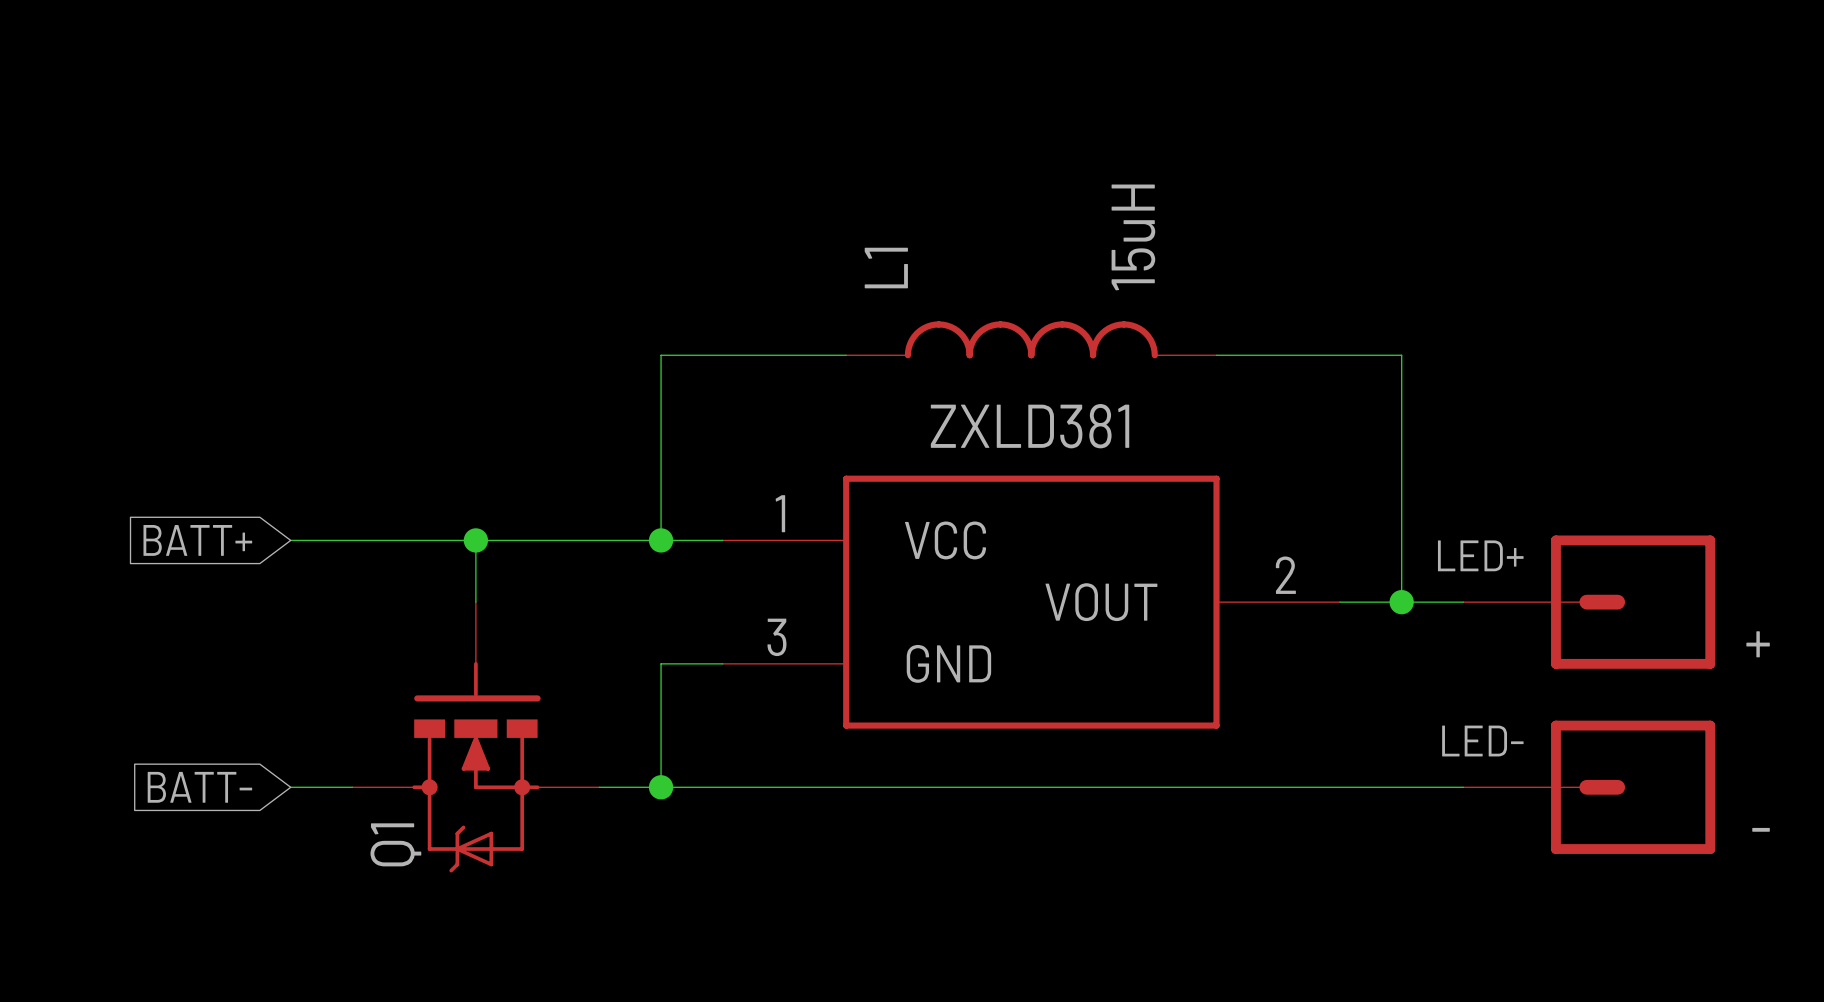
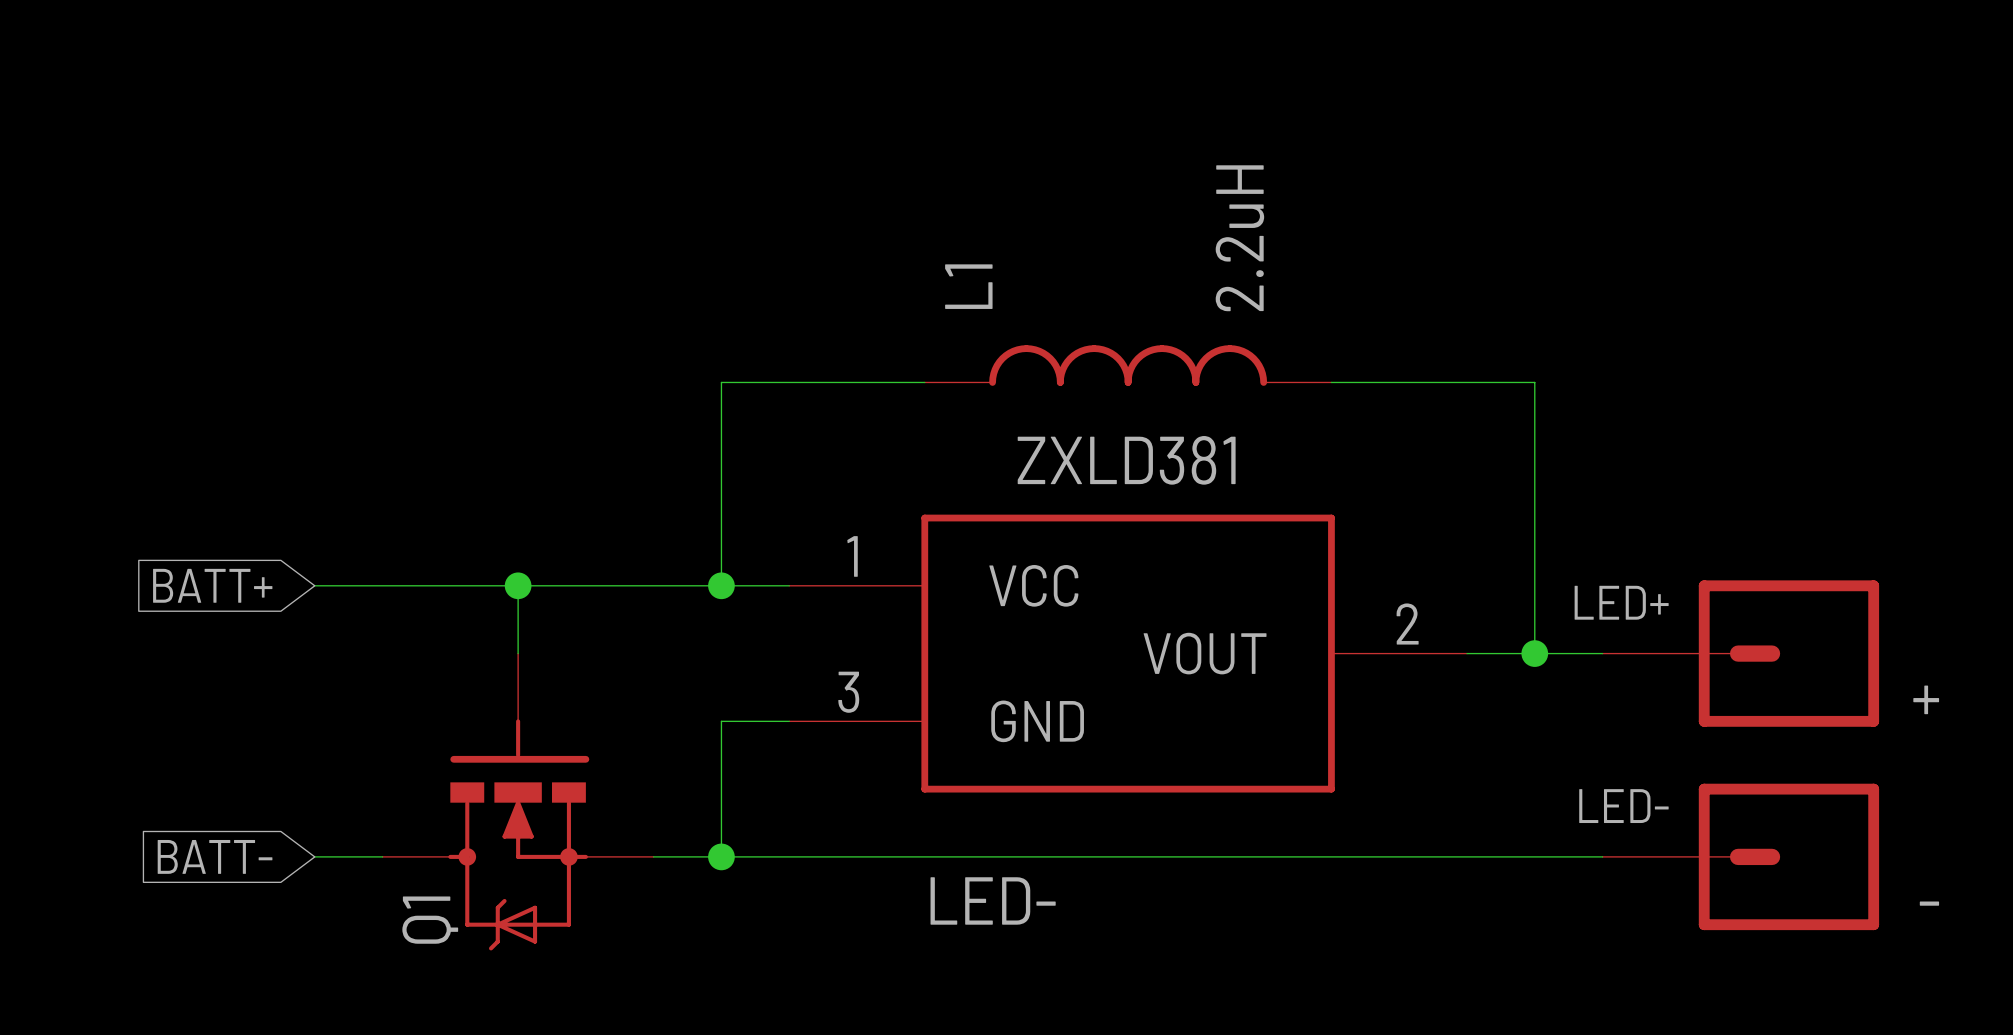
L1 value: 15uH (1133, 237) -> 2.2uH (1239, 238)
label: none -> LED- (993, 900)

